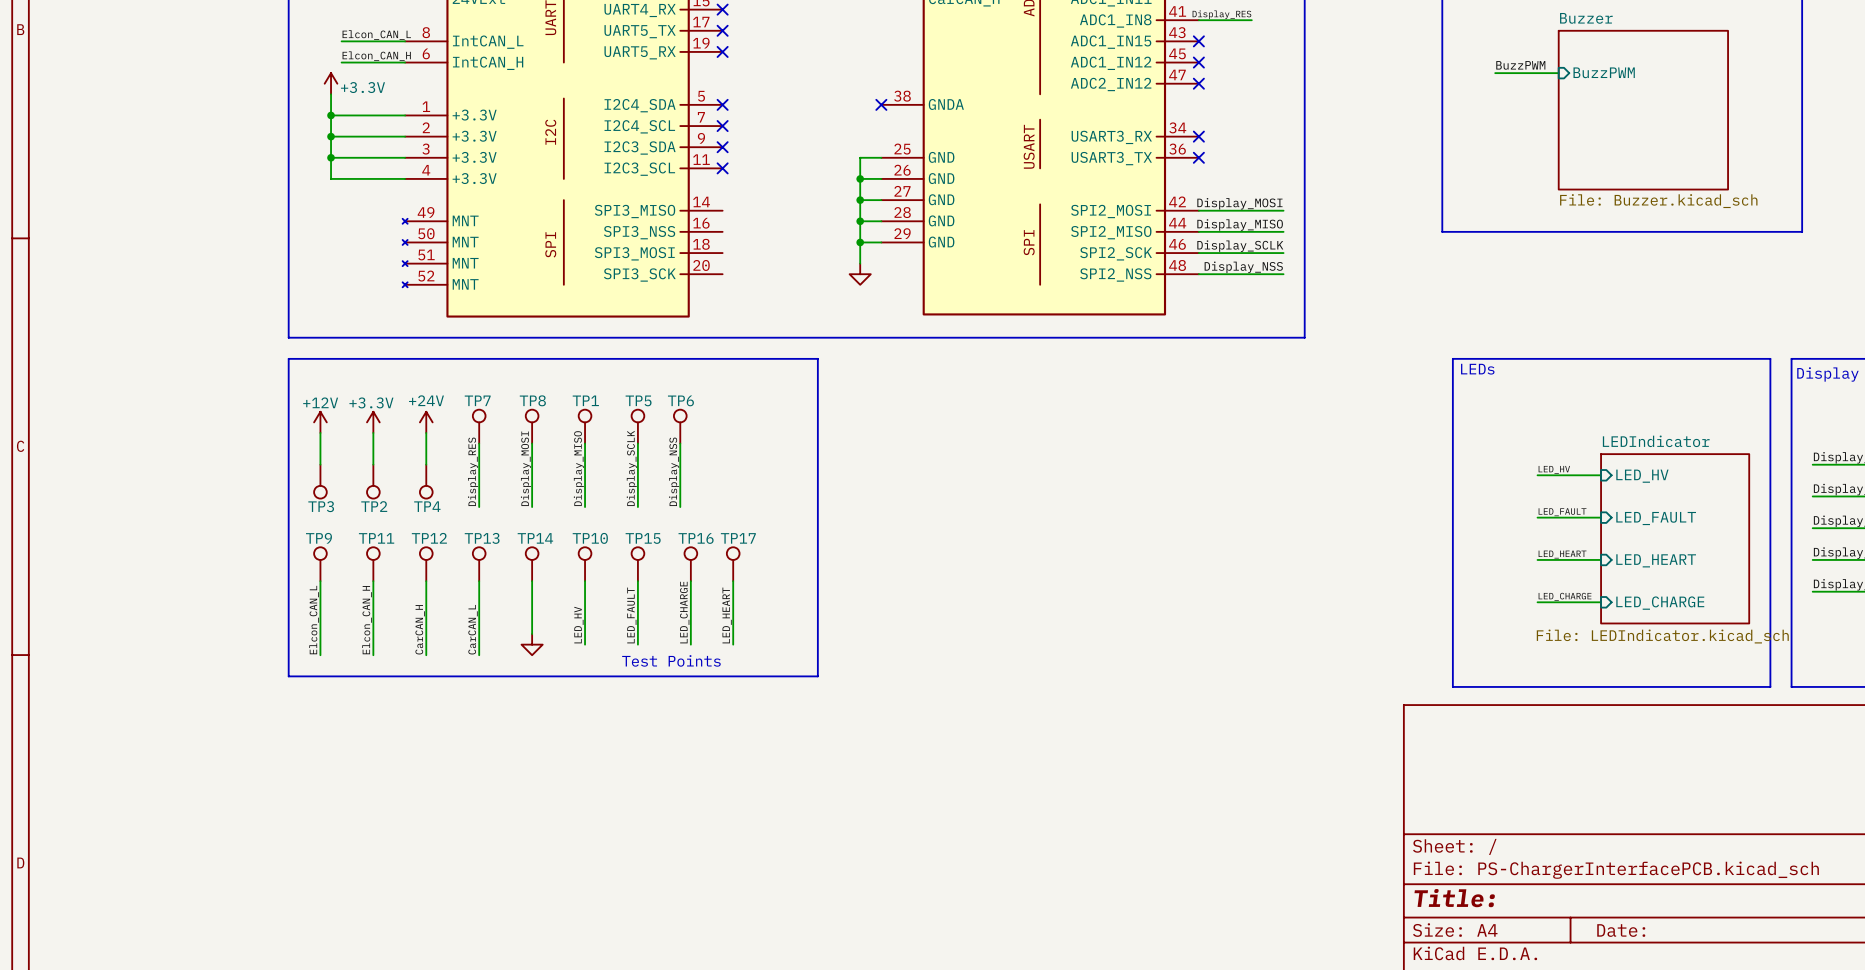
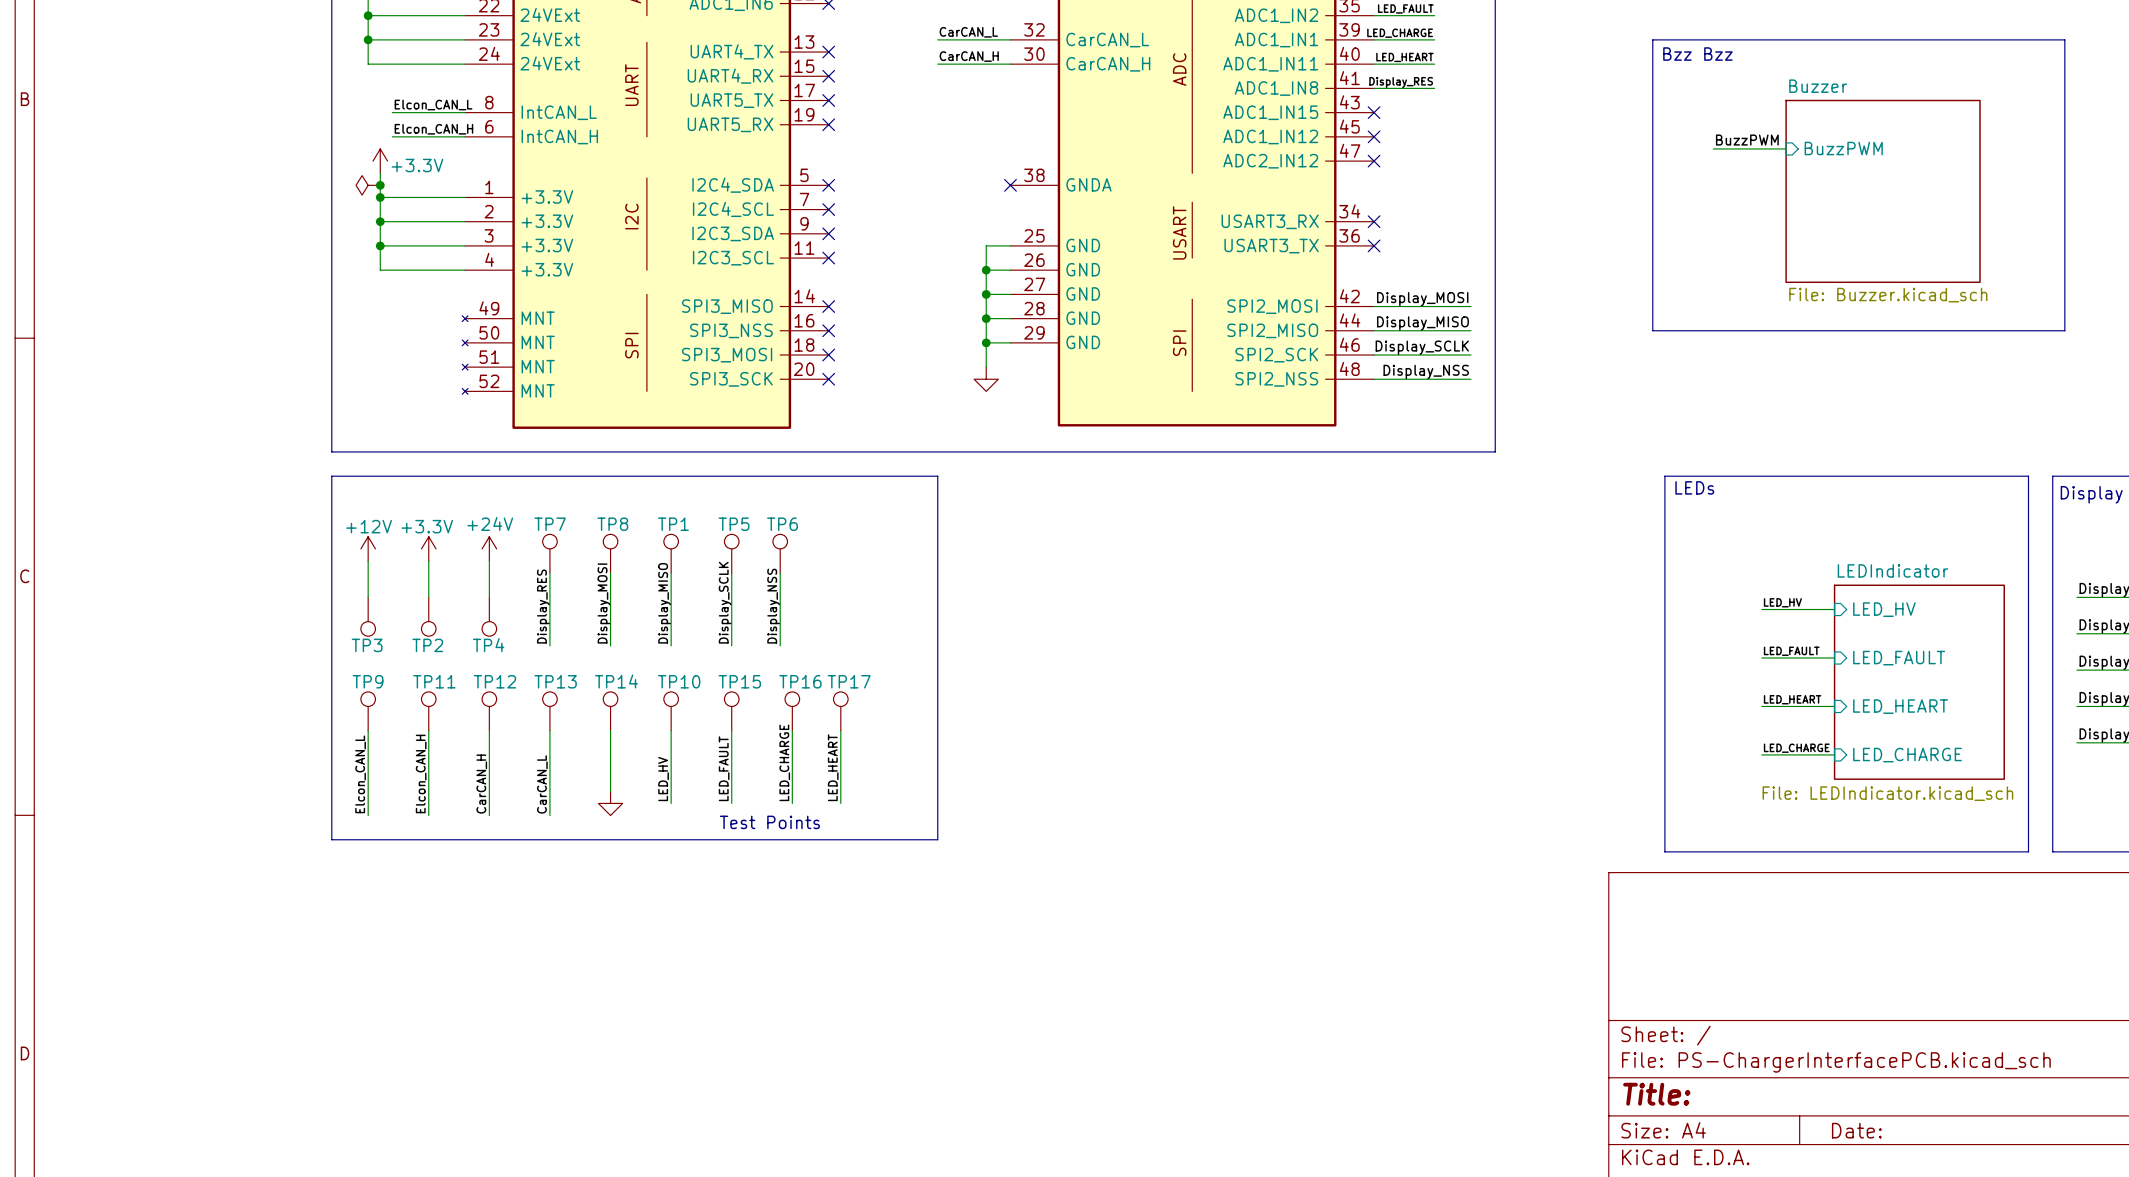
power symbol: none -> (368, 185)
junction: none -> (380, 185)
no-connect mark: none -> (828, 306)
no-connect mark: none -> (828, 330)
no-connect mark: none -> (828, 355)
no-connect mark: none -> (828, 379)

